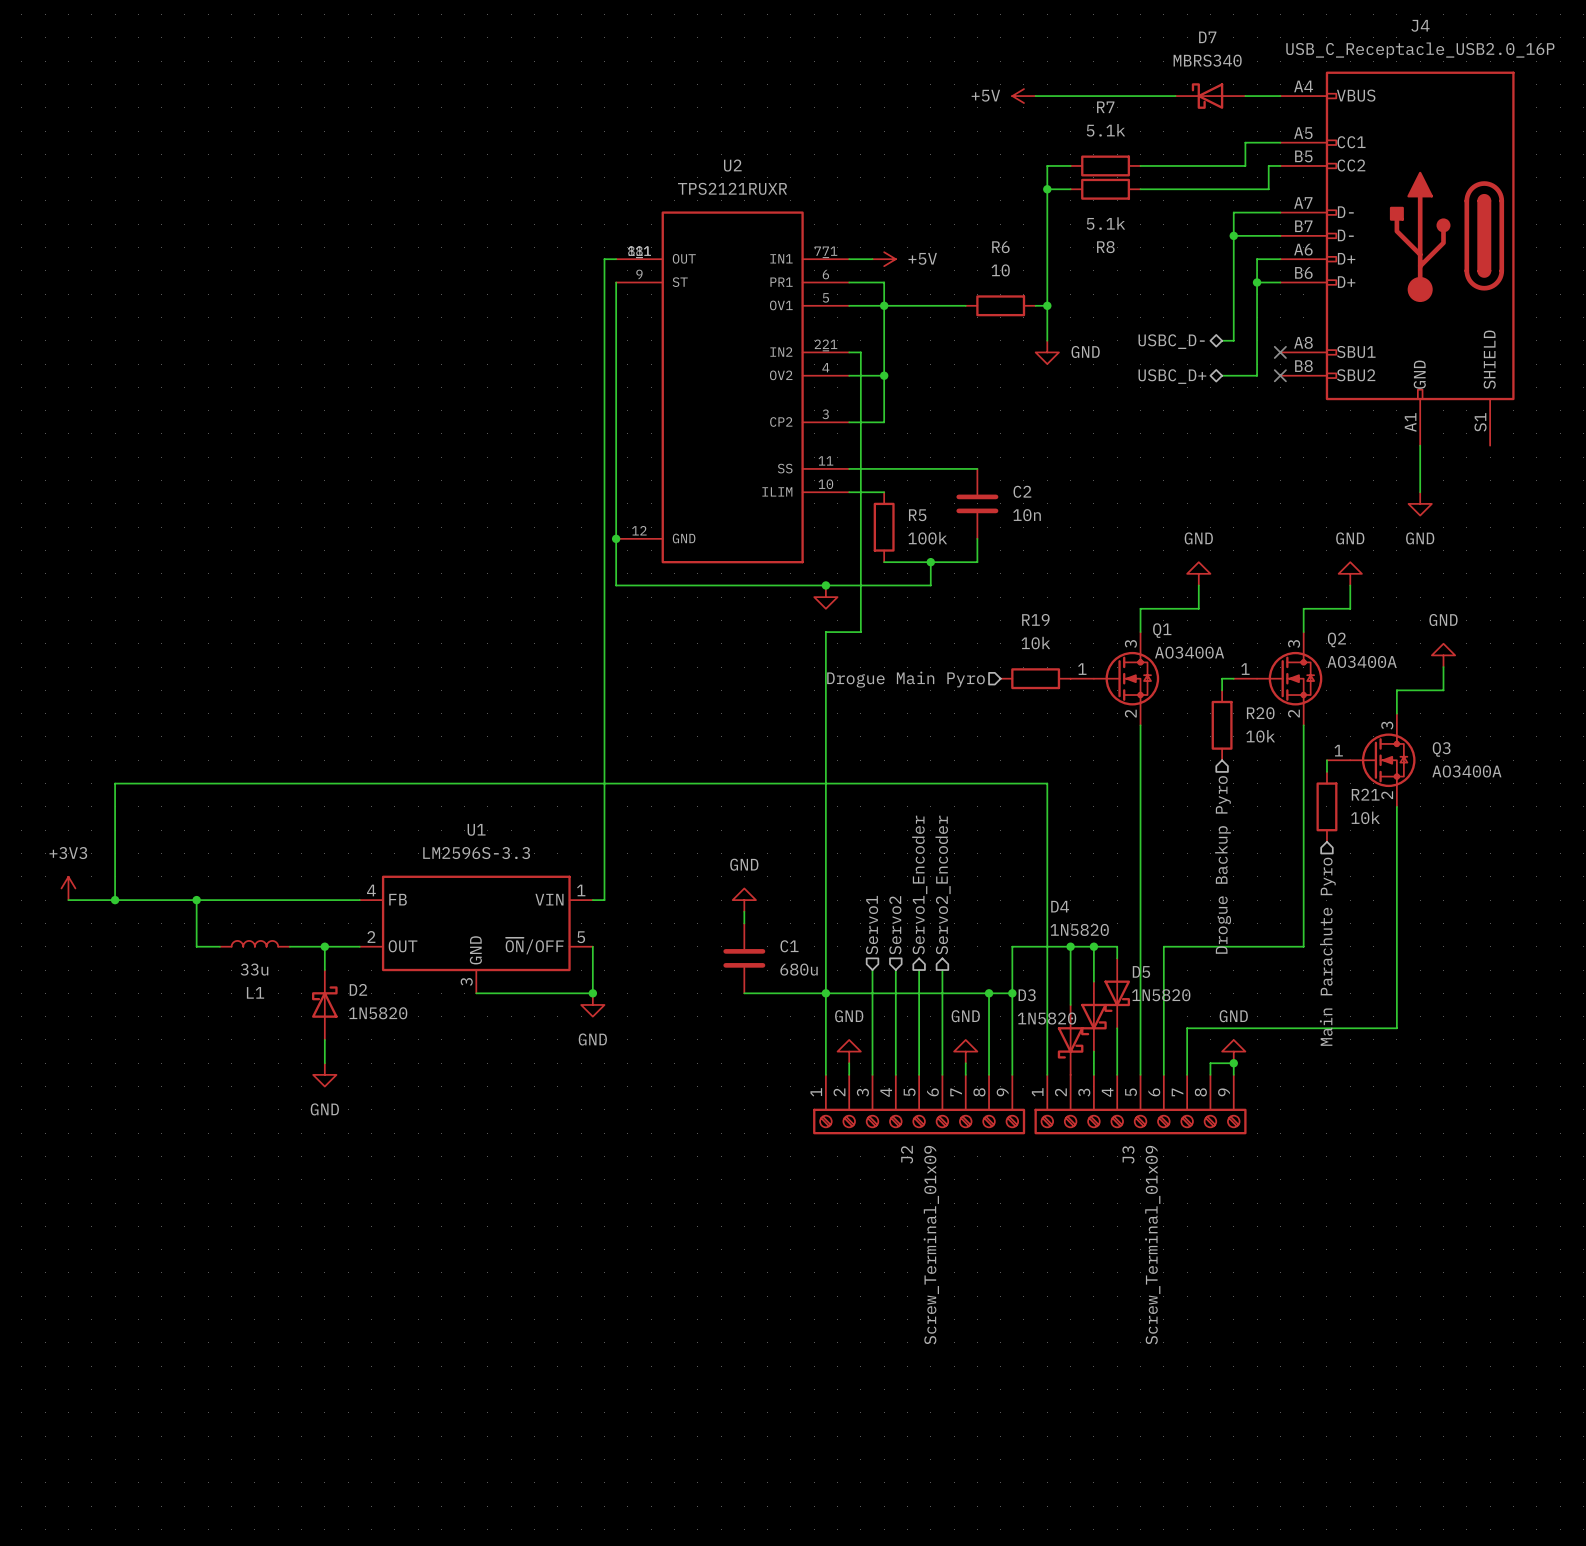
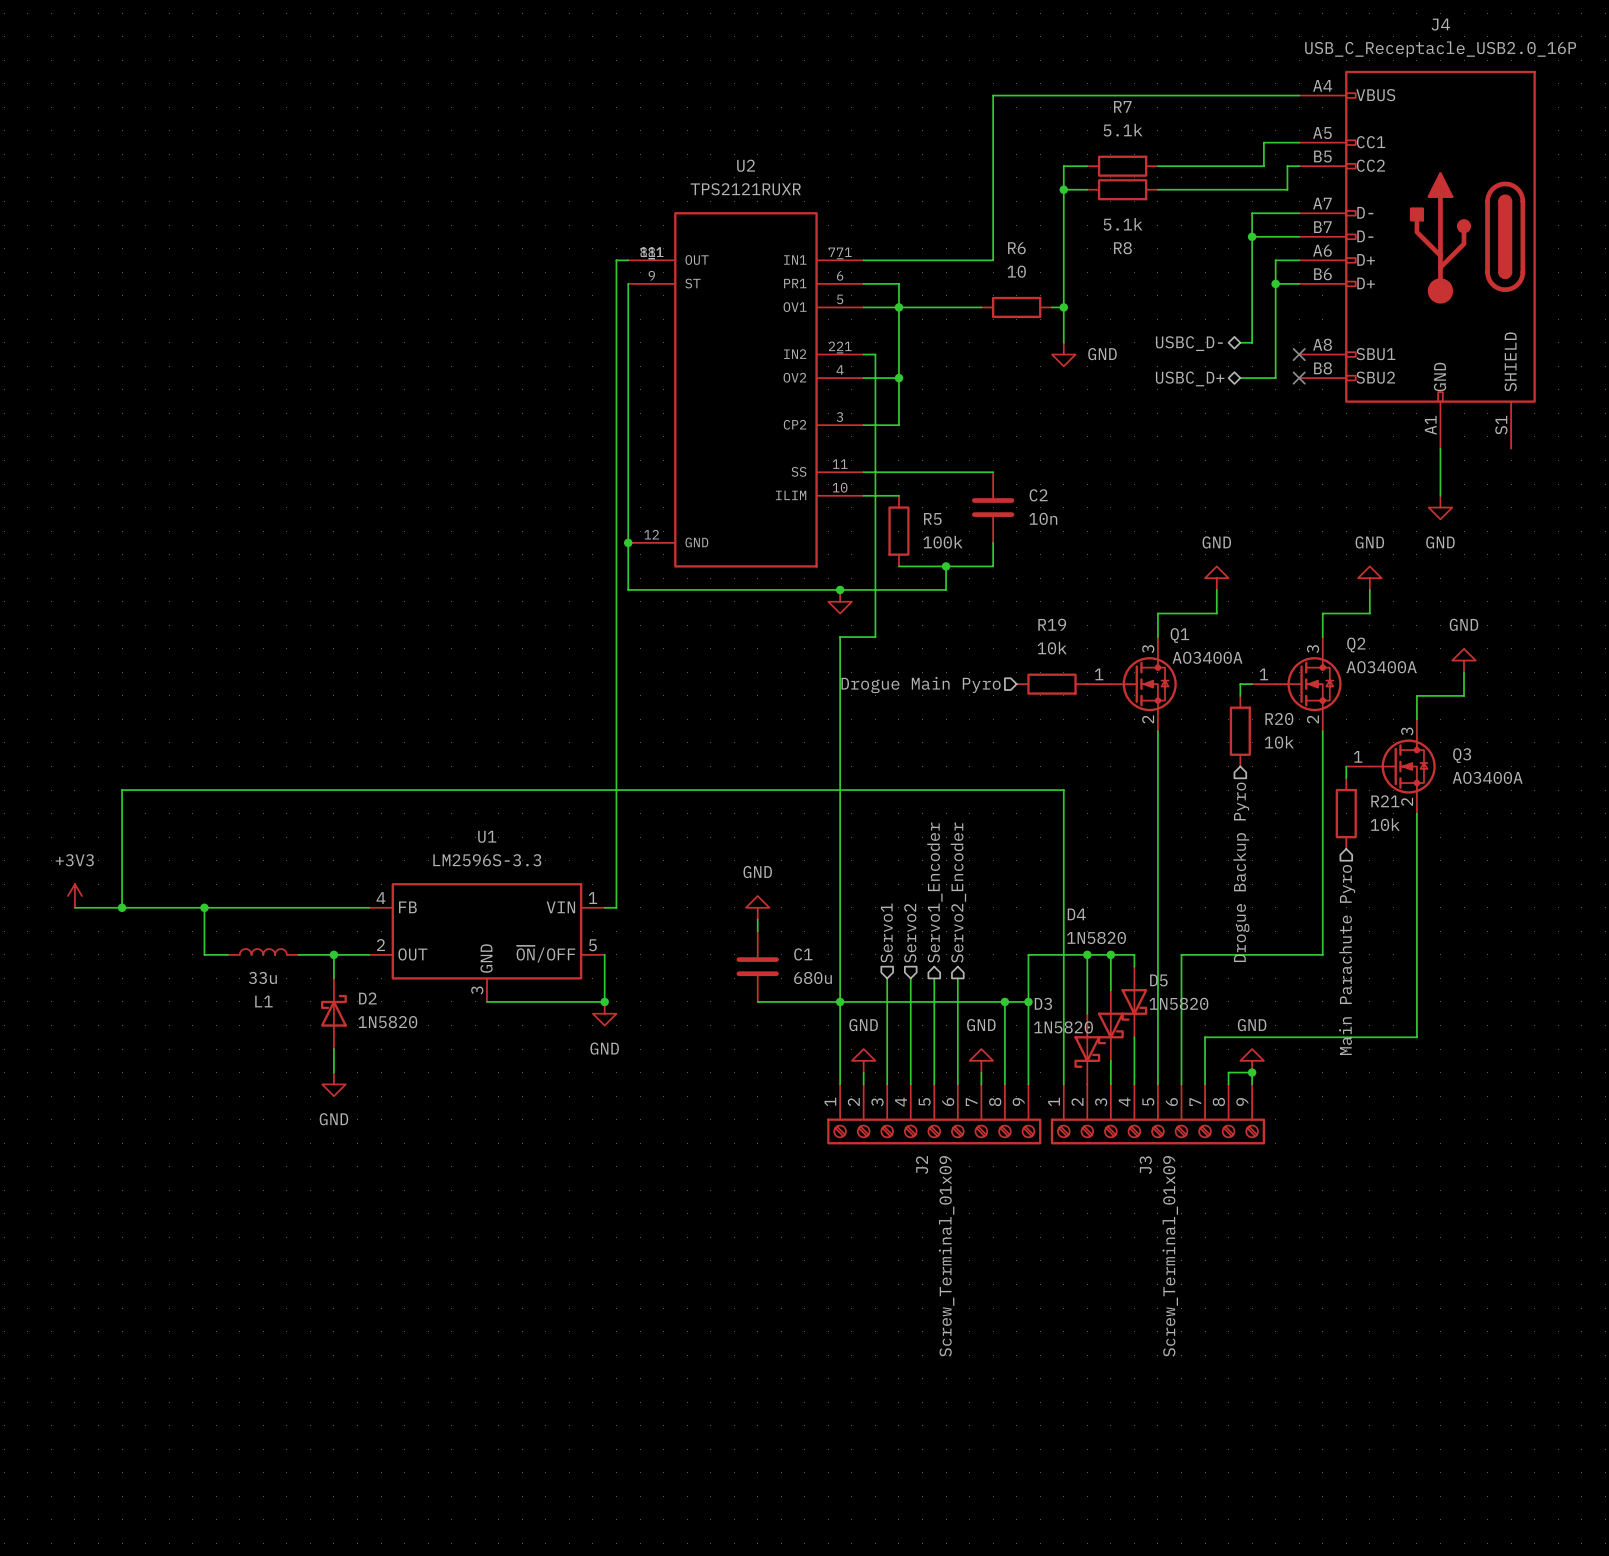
power symbol: +5V (1023, 96) -> none
wire: none -> (1052, 95) (993, 95) (993, 260) (887, 260)
D7: MBRS340 (1210, 96) -> none
power symbol: +5V (884, 259) -> none

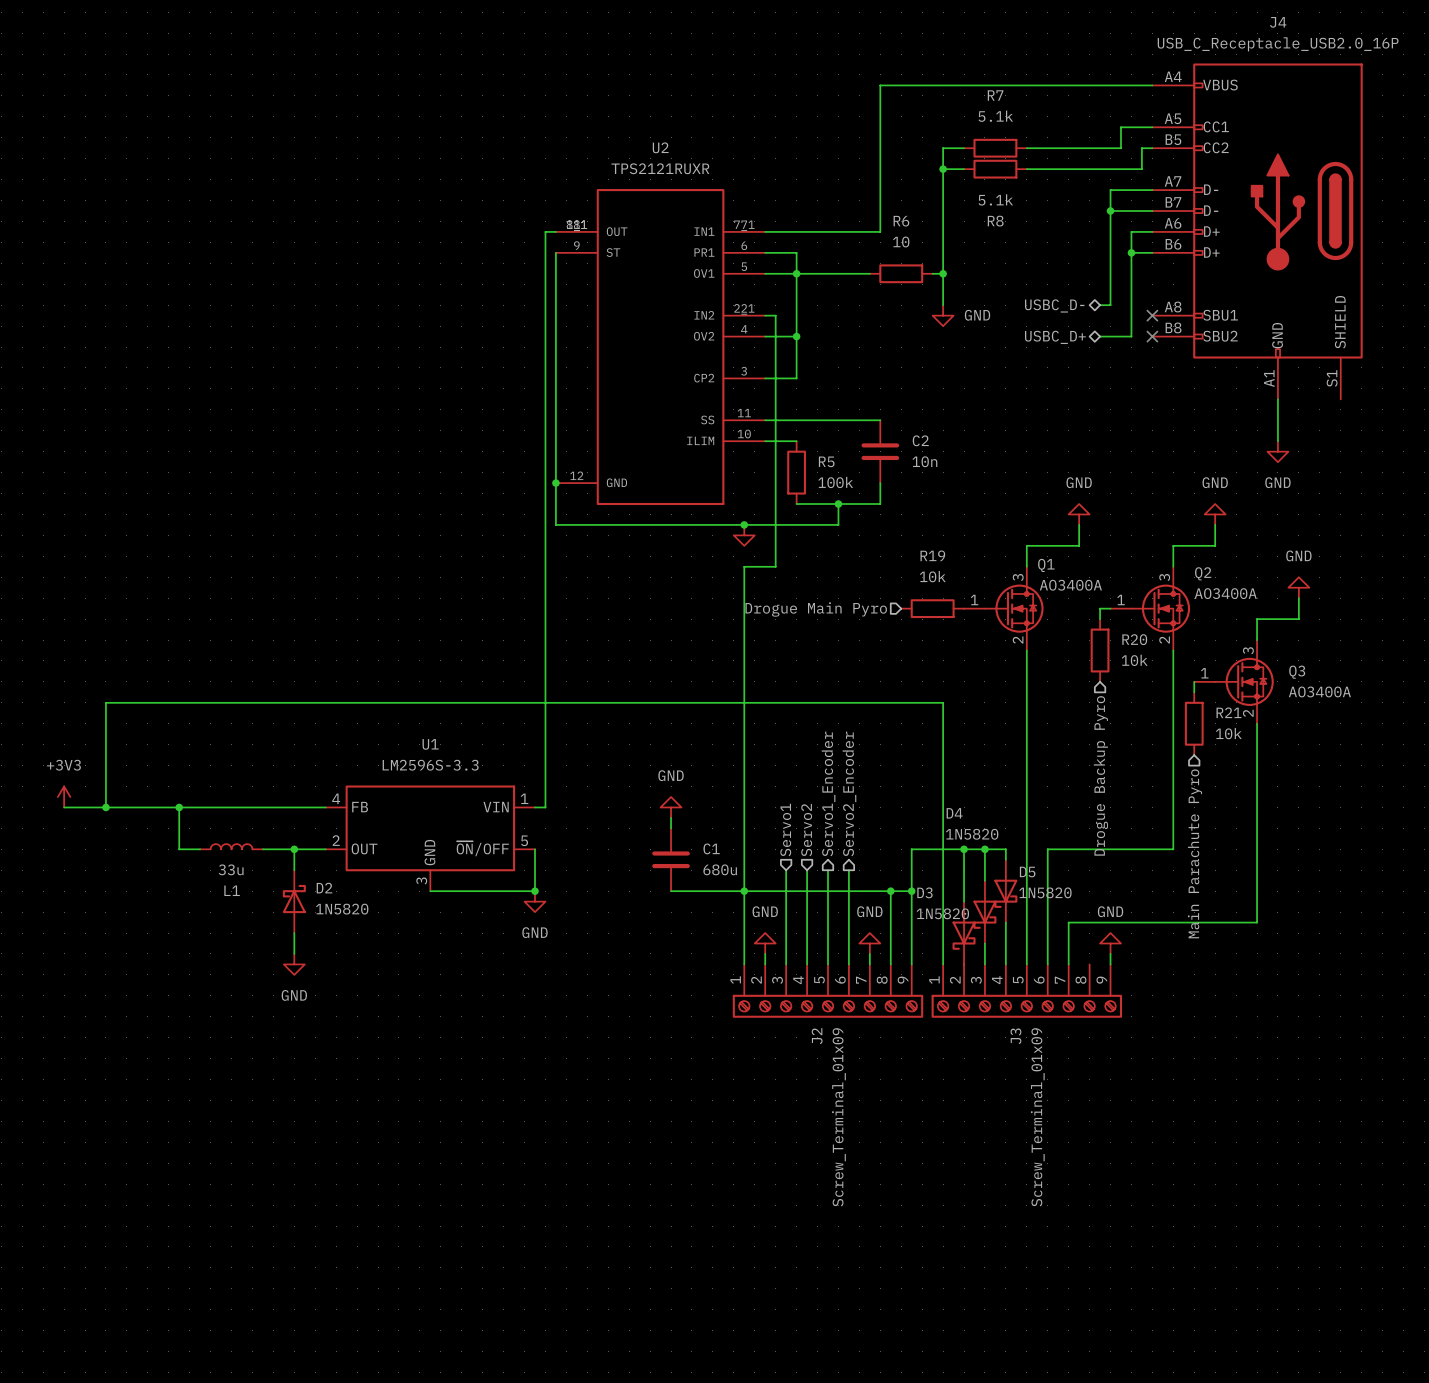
wire: (1252, 1072) (1228, 1072) (1228, 1084) -> none
junction: (1252, 1072) -> none

